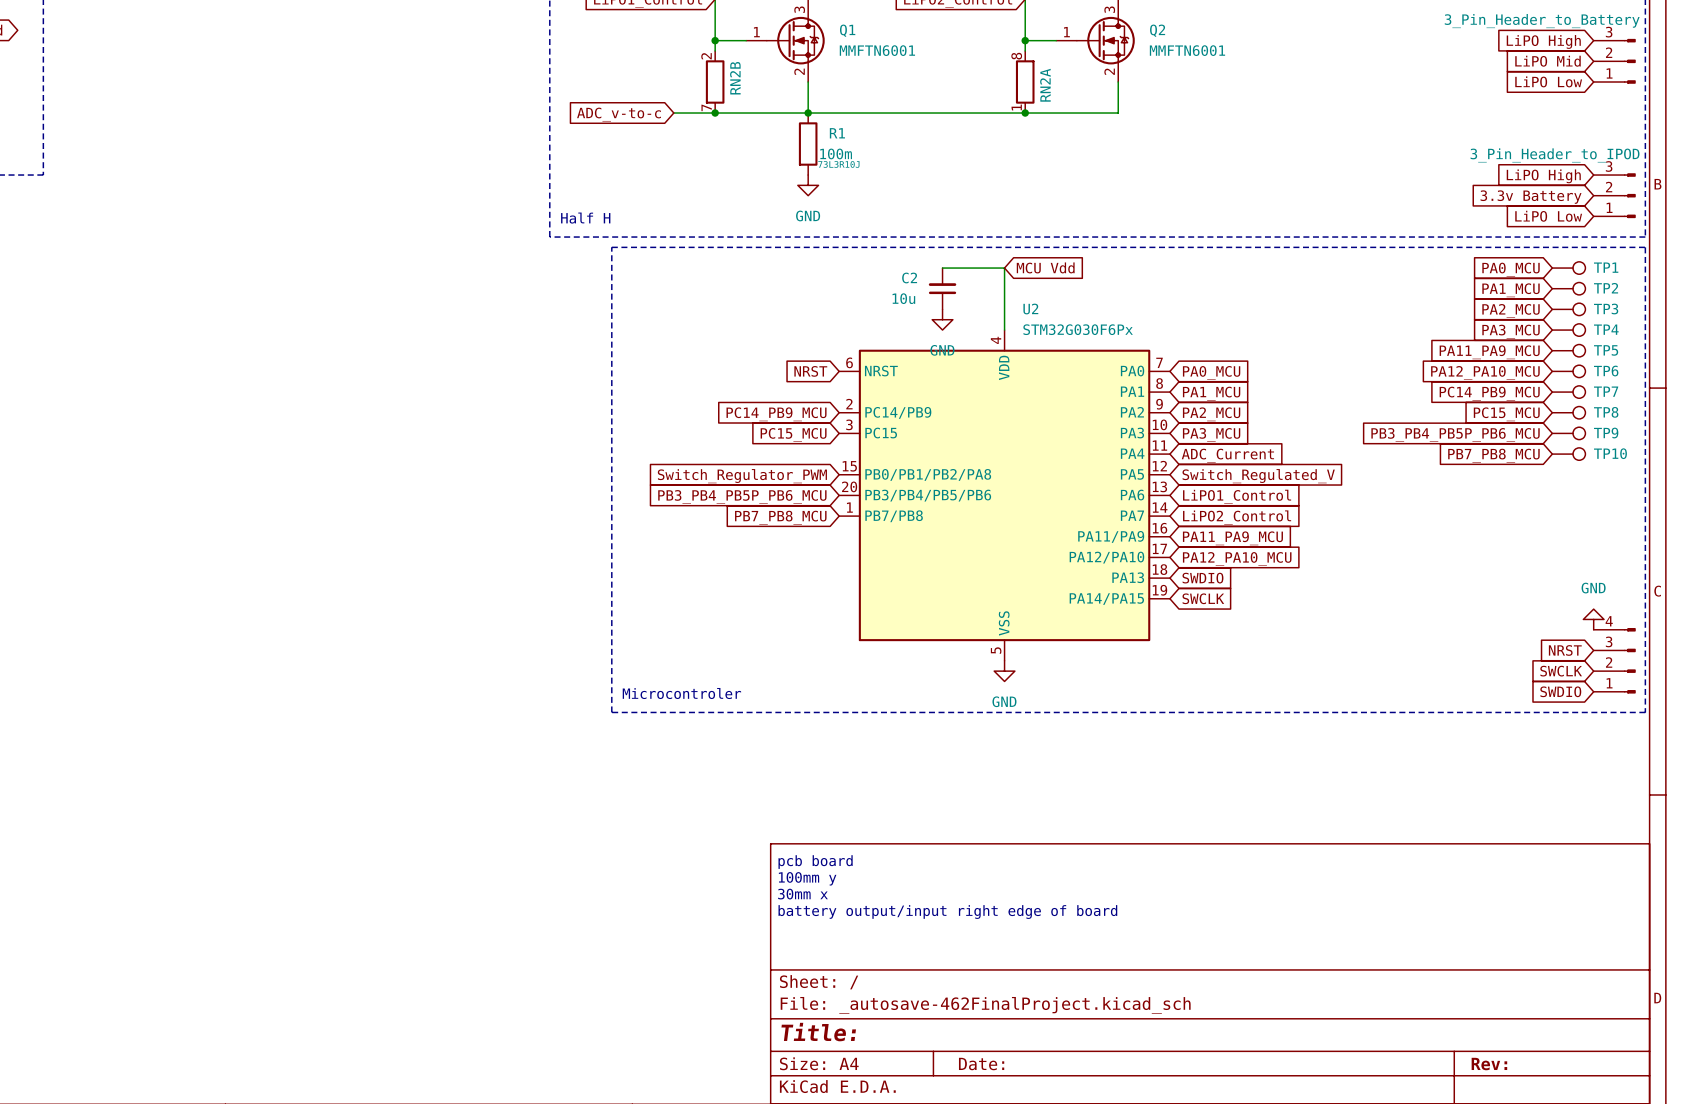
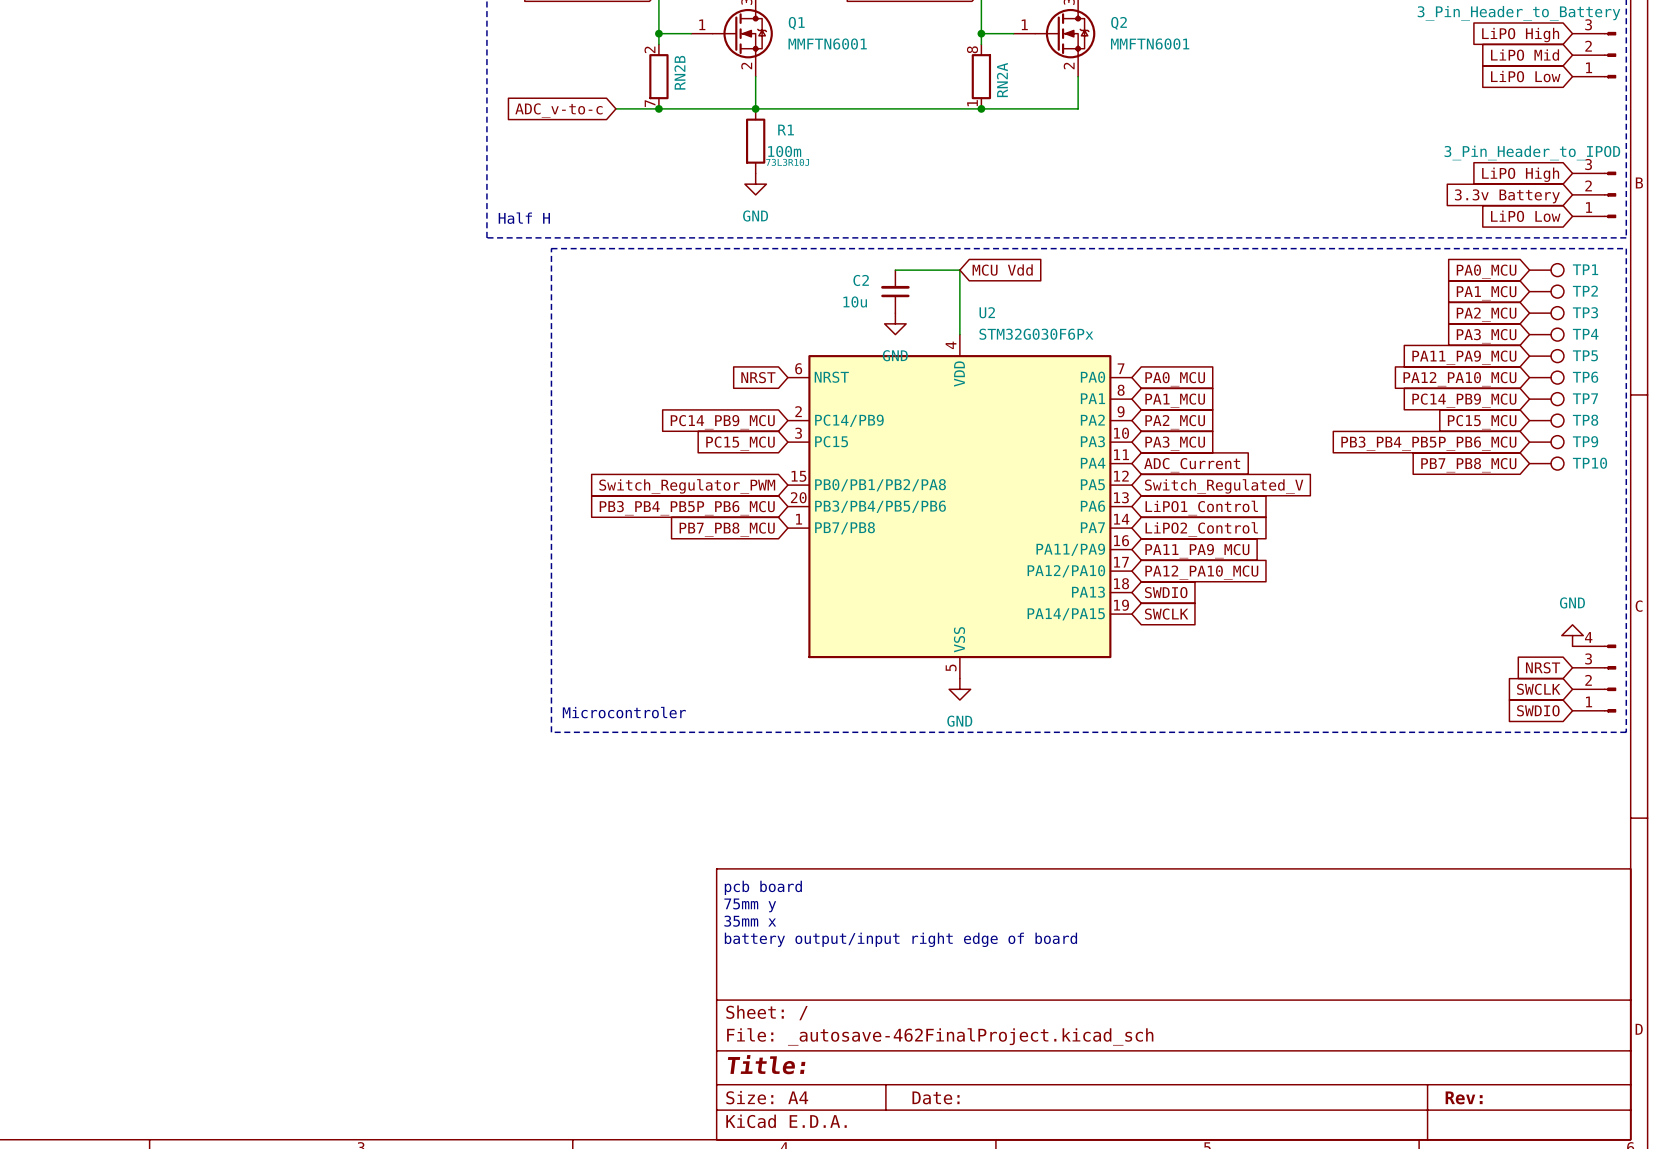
text: 100mm y (807, 878) -> 75mm y (750, 905)
text: 30mm x (802, 894) -> 35mm x (750, 921)

